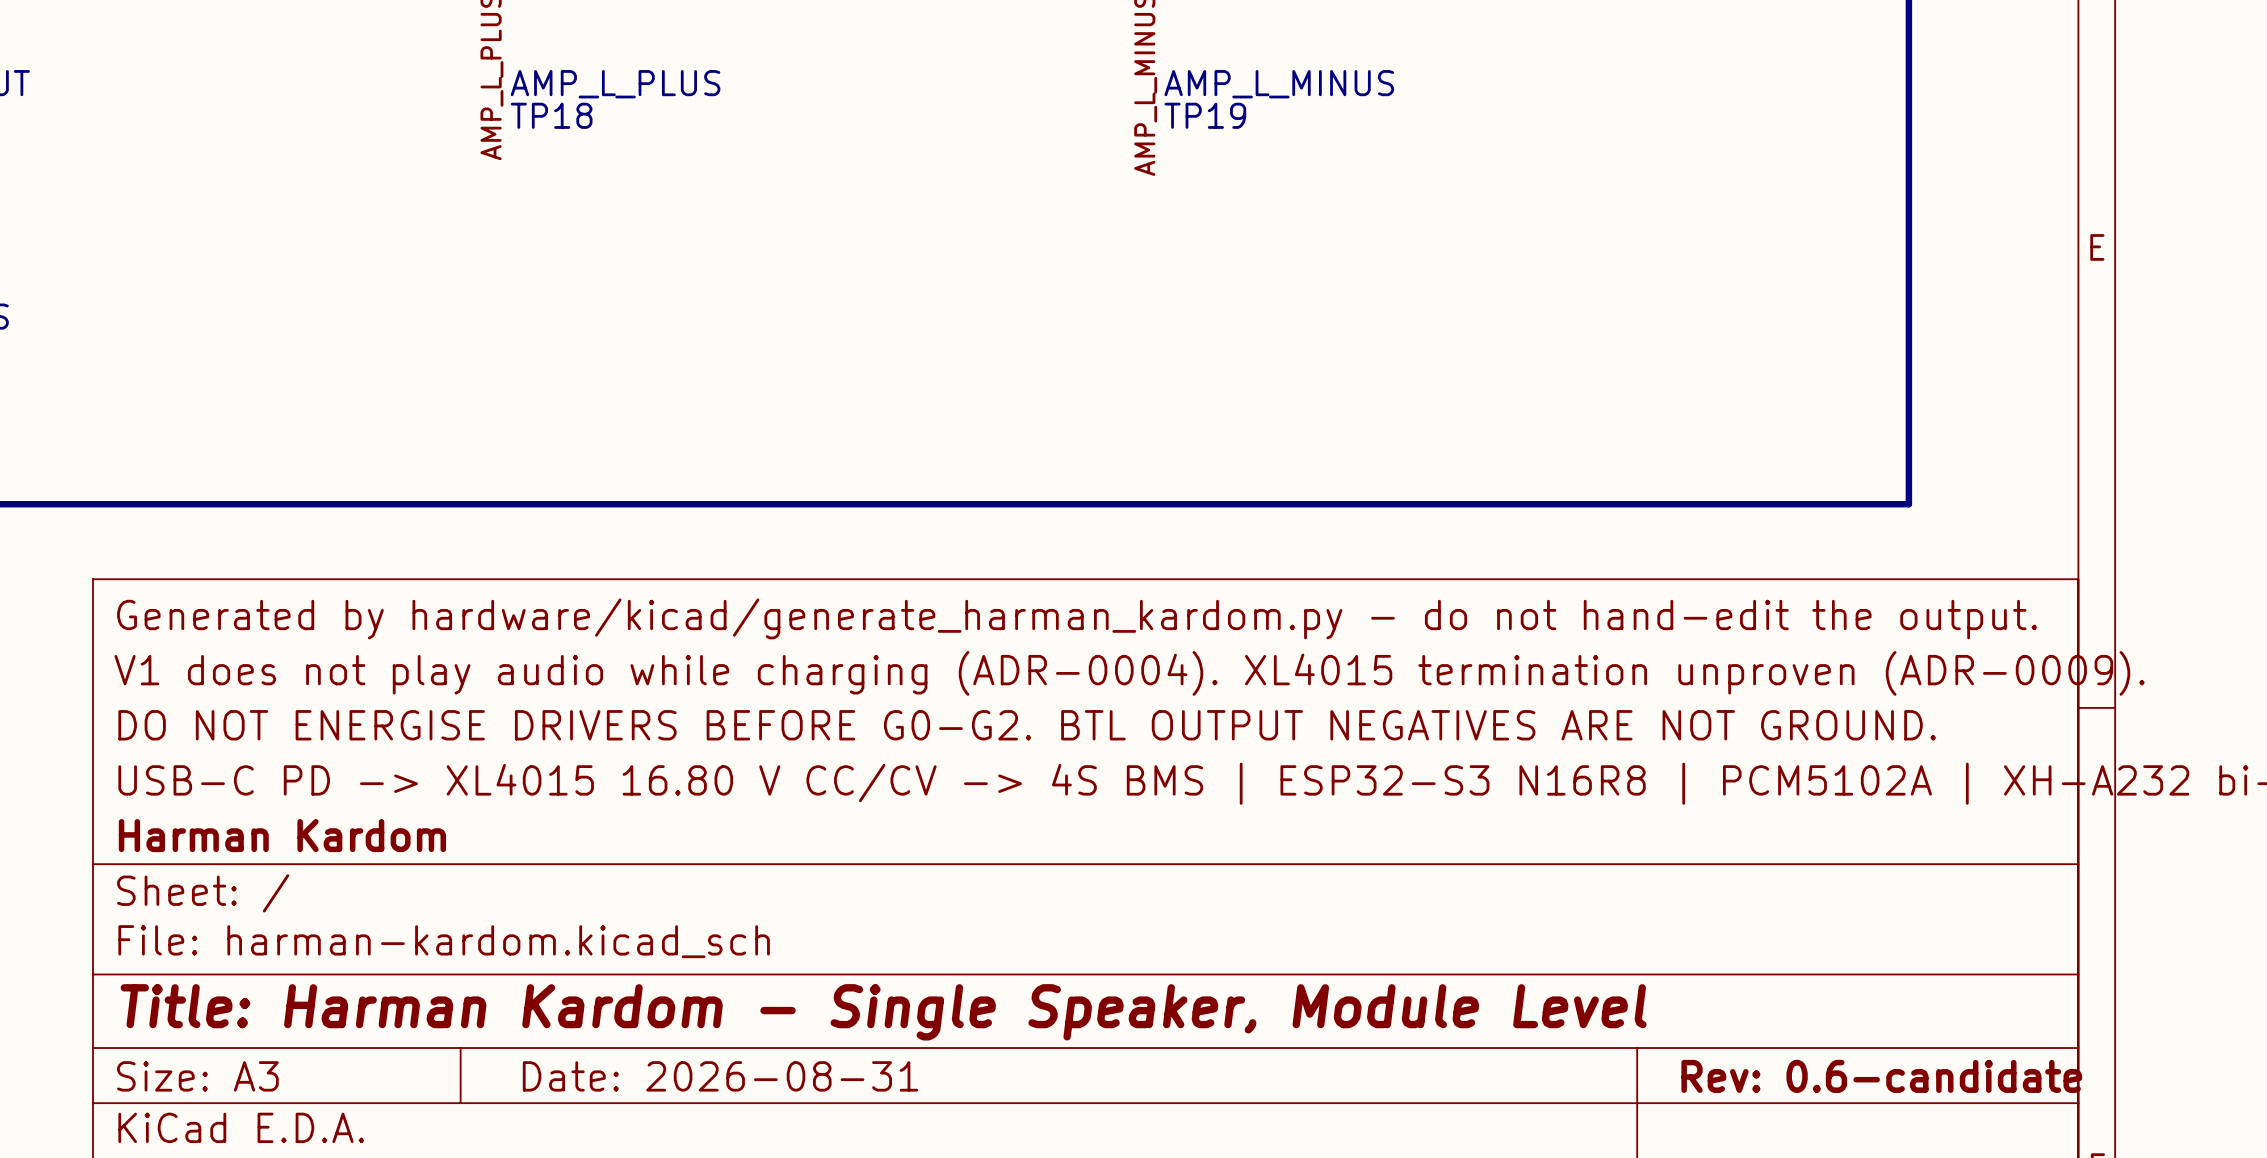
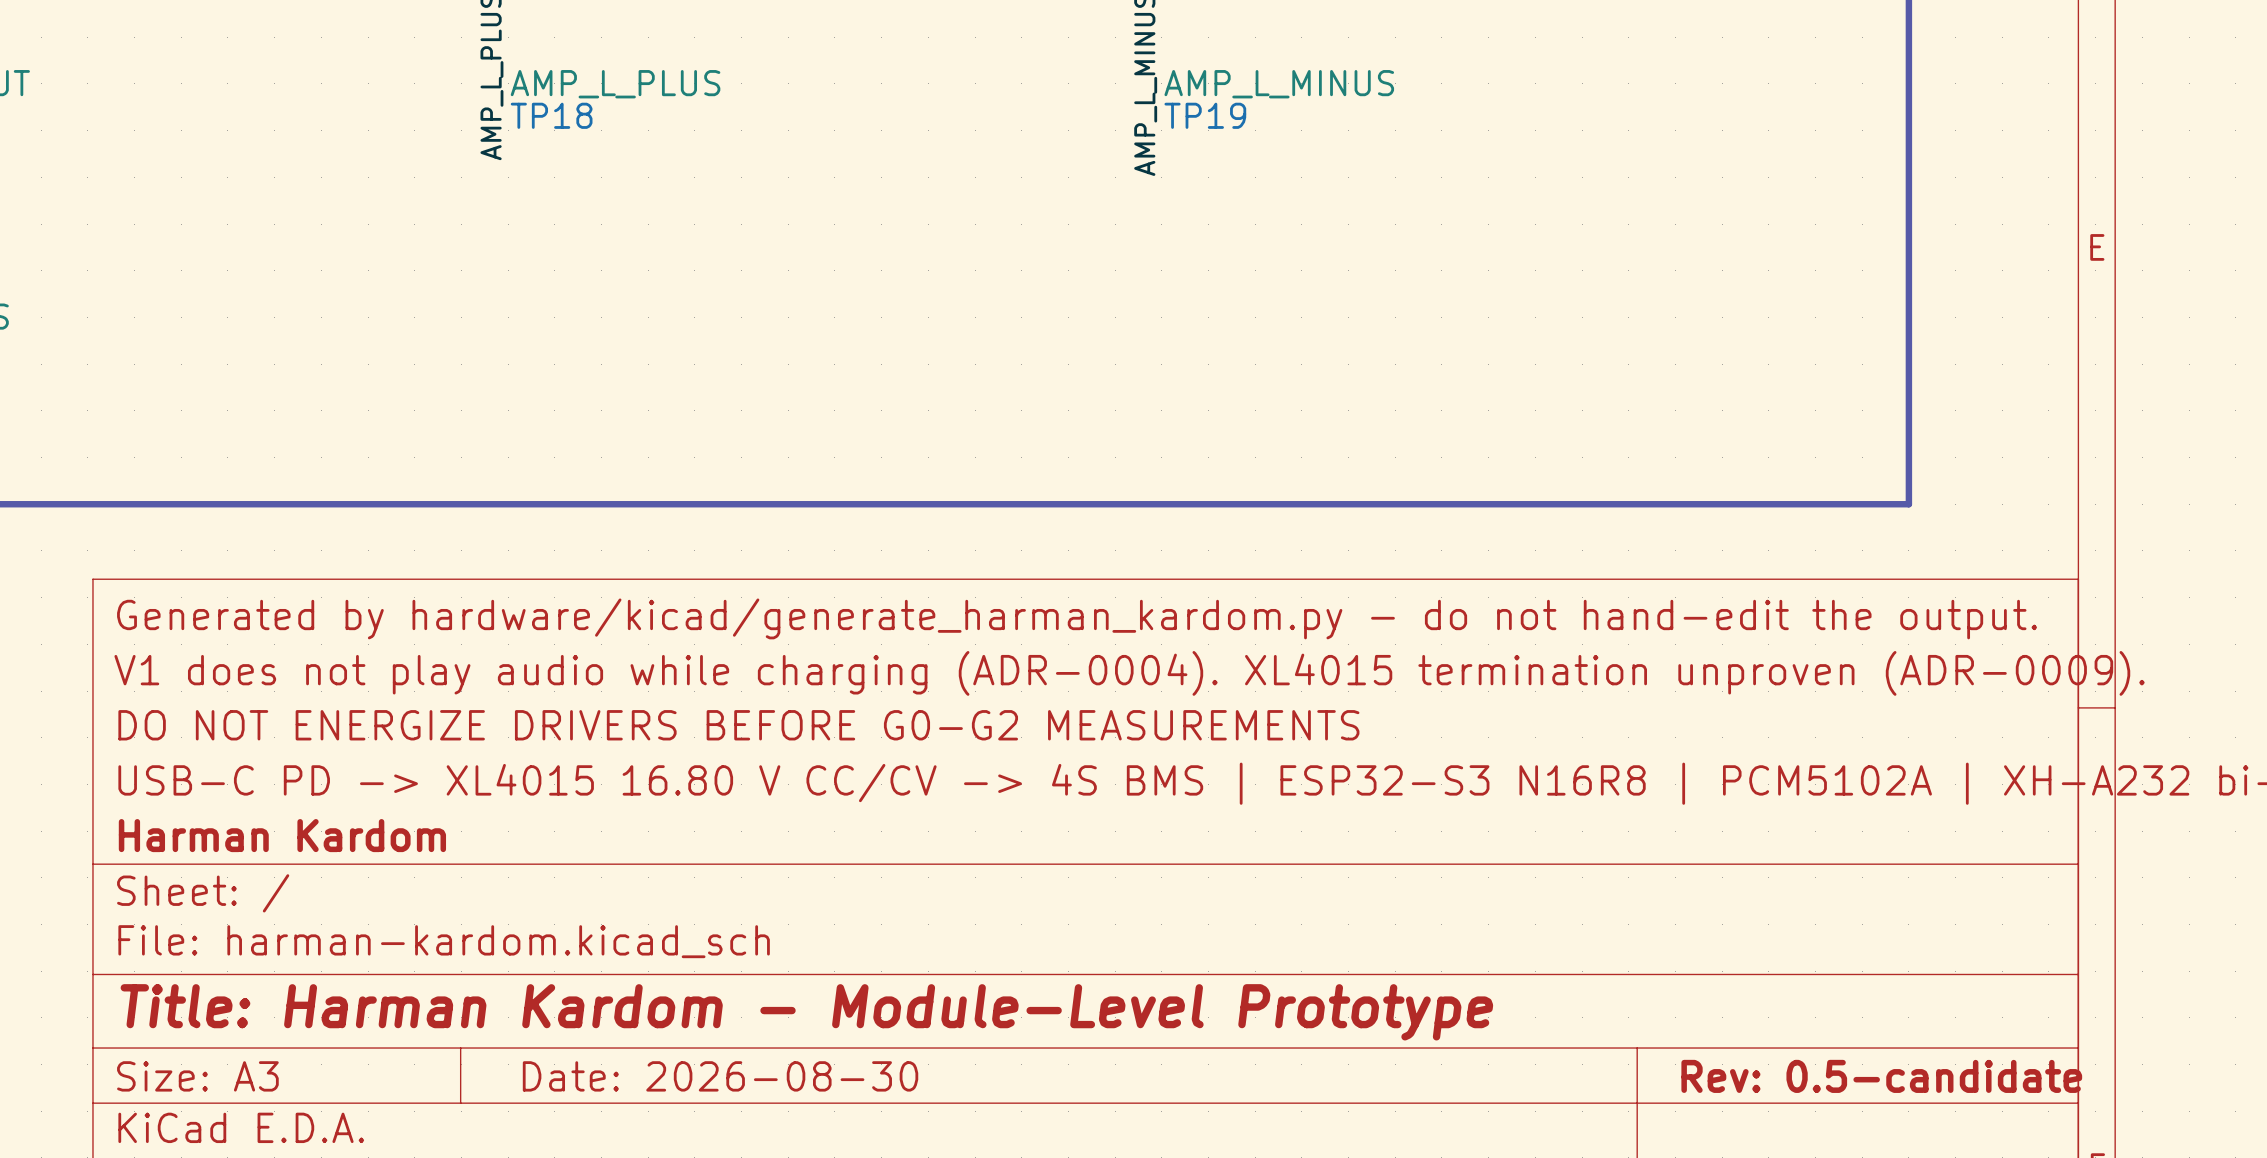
title block: DO NOT ENERGISE DRIVERS BEFORE G0-G2. BTL OUTPUT NEGATIVES ARE NOT GROUND. (1027, 725) -> DO NOT ENERGIZE DRIVERS BEFORE G0-G2 MEASUREMENTS (738, 725)
title block: Title: Harman Kardom - Single Speaker, Module Level (883, 1012) -> Title: Harman Kardom - Module-Level Prototype (806, 1012)
title block: Date: 2026-08-31 (720, 1076) -> Date: 2026-08-30 (720, 1076)
title block: Rev: 0.6-candidate (1881, 1076) -> Rev: 0.5-candidate (1881, 1076)

